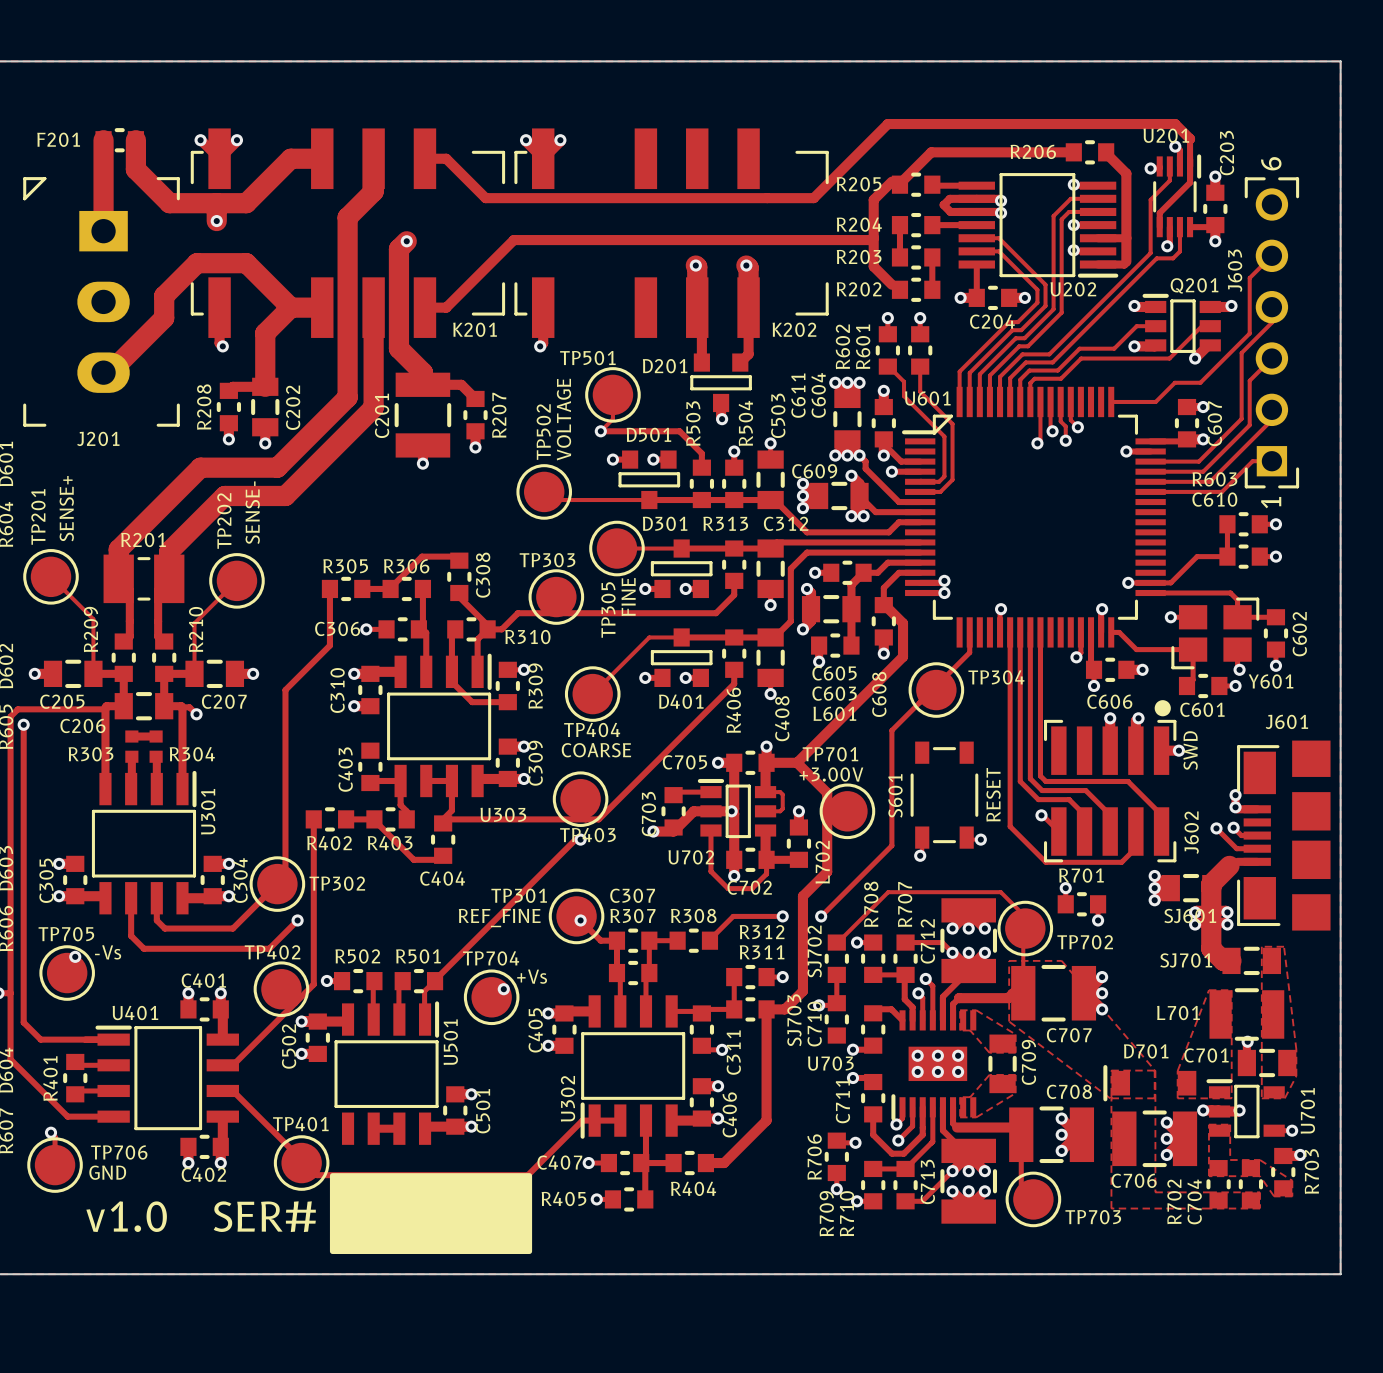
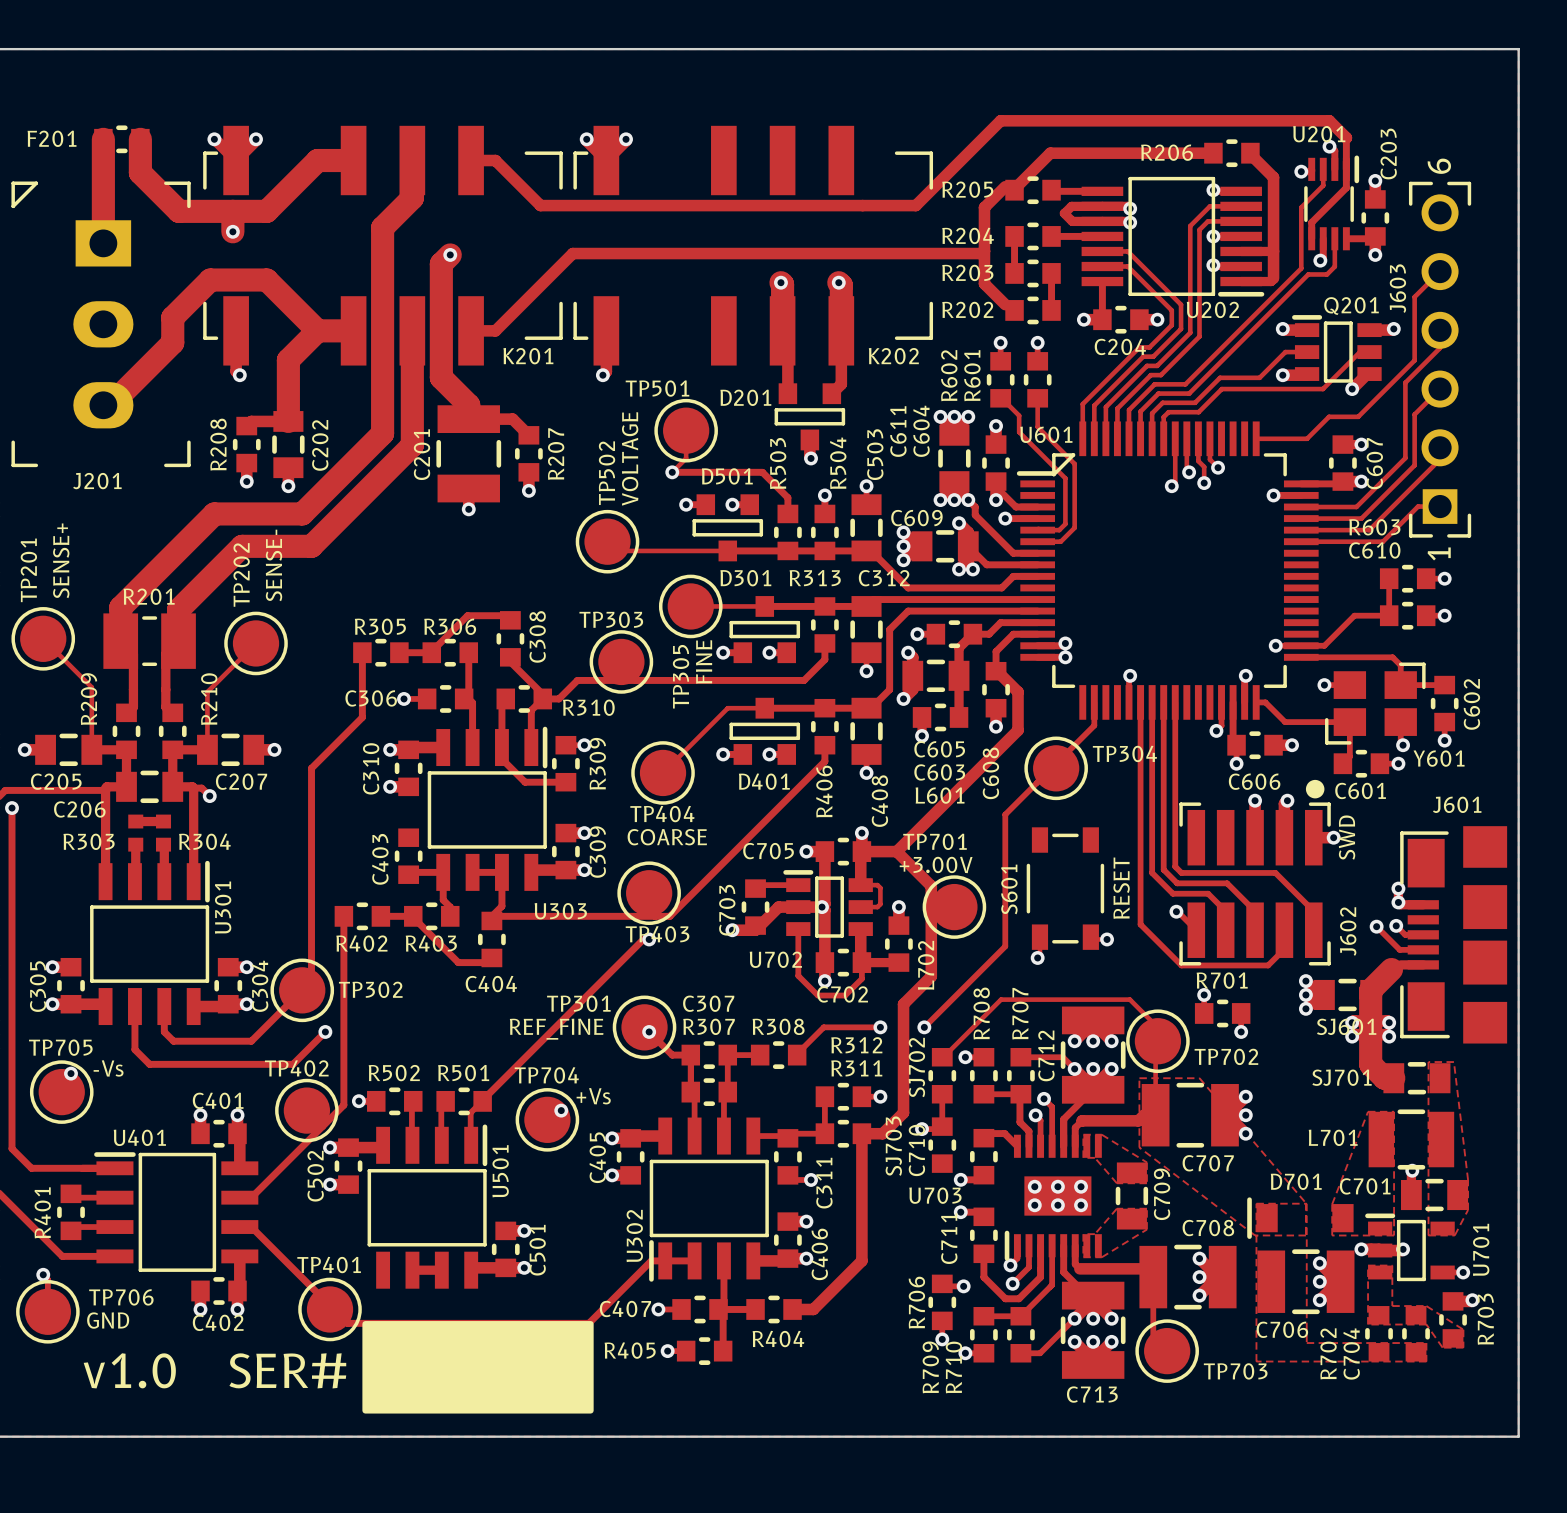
C713 name rotation: 0° (927, 1181) -> 90° clockwise (1092, 1394)
C713 name position: C713 (927, 1181) -> C713 (1092, 1394)

